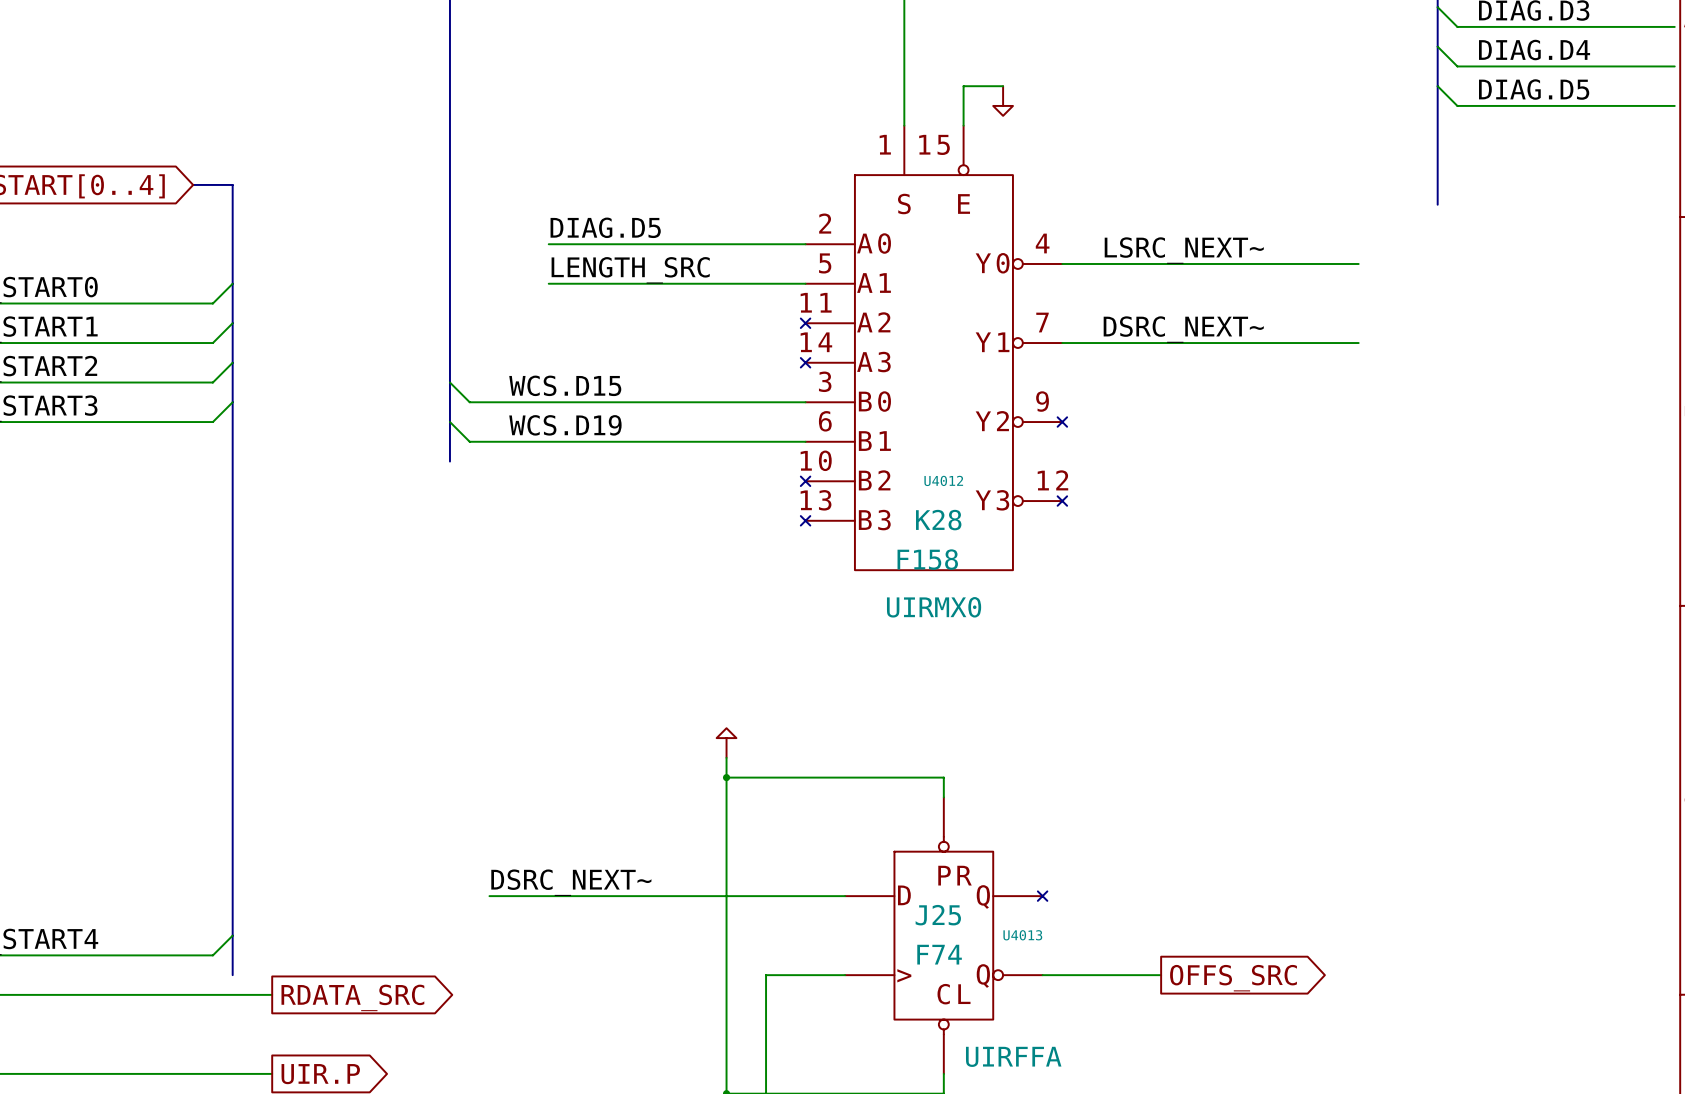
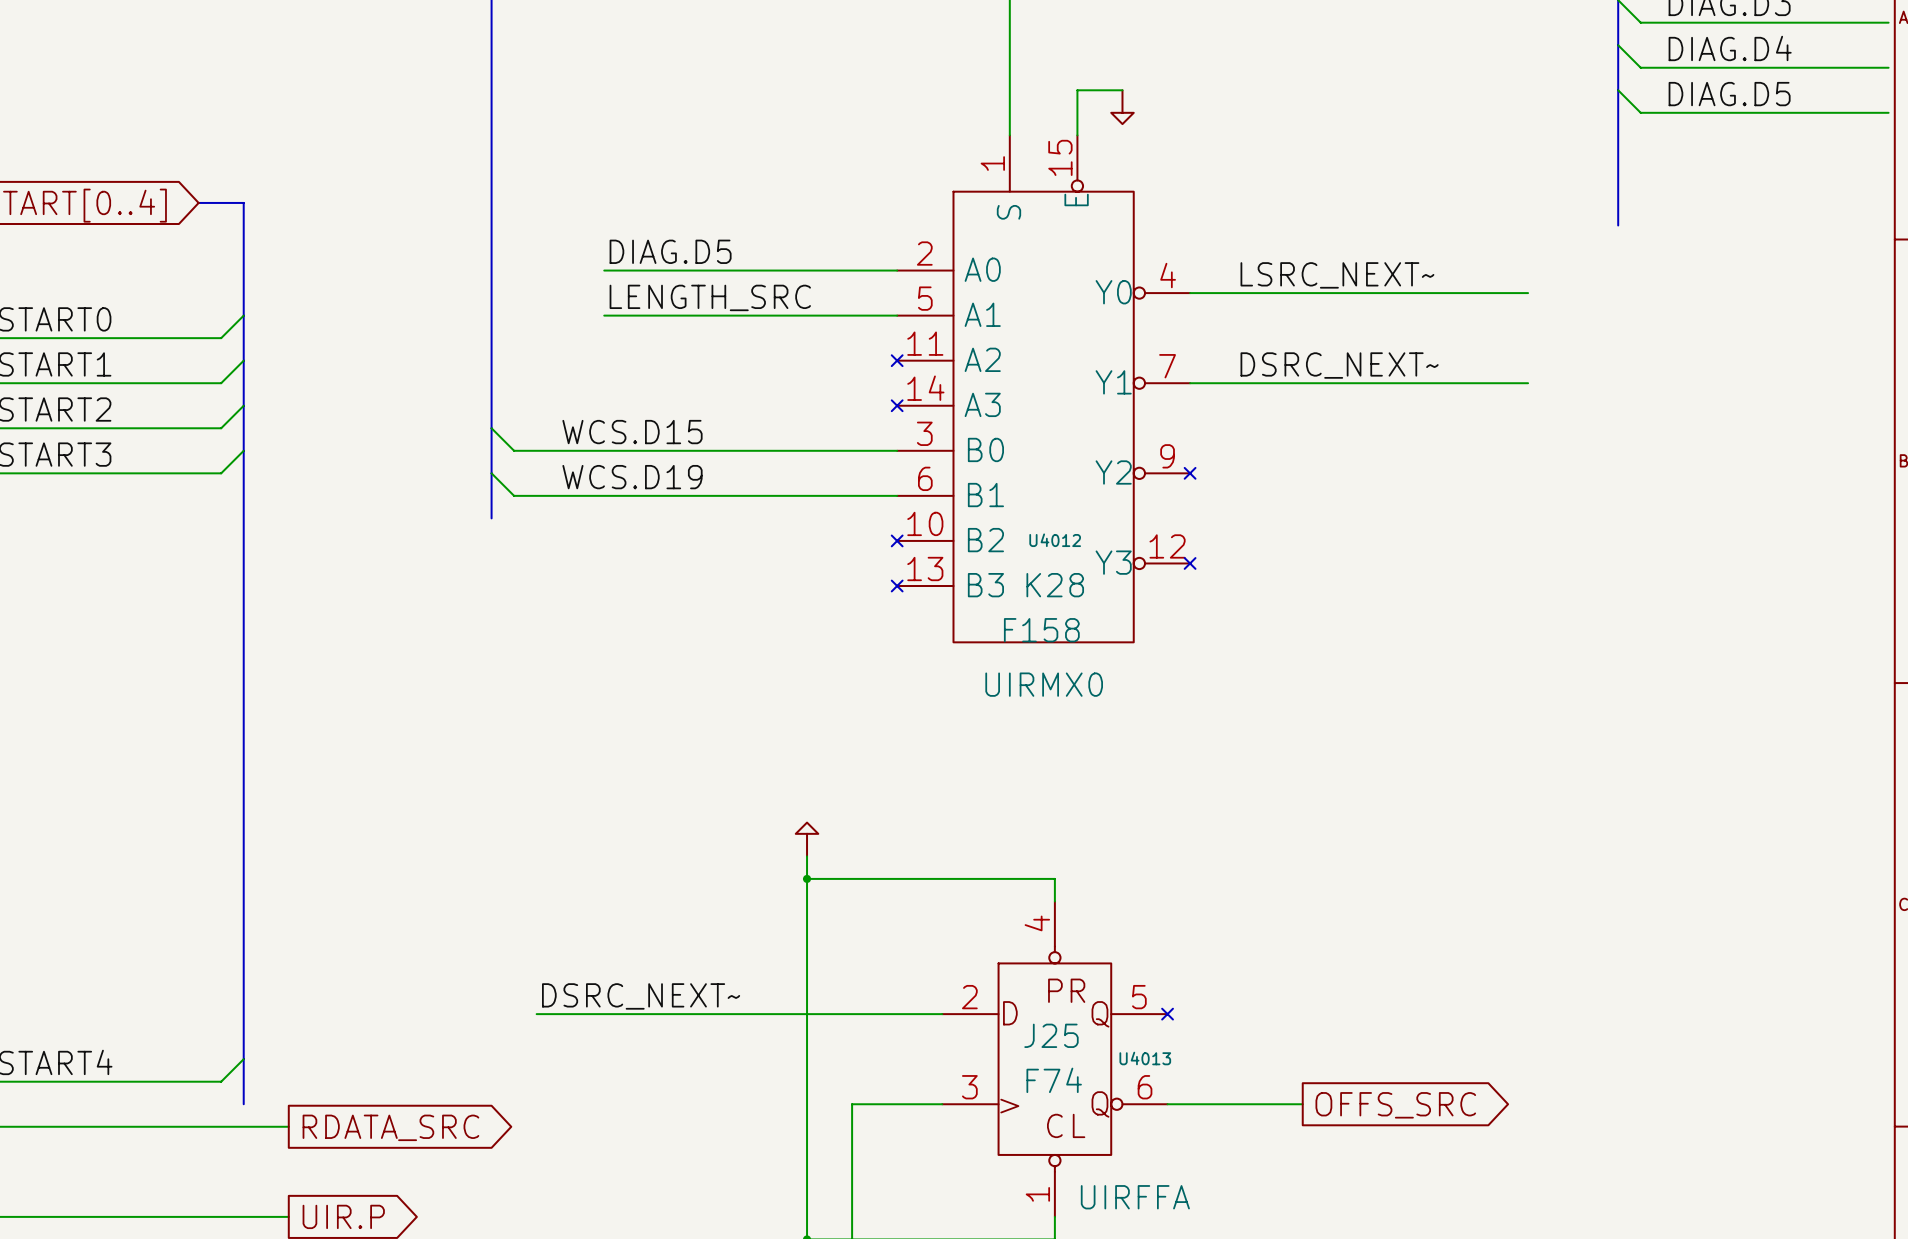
U4012 symbol: [805, 125, 1063, 571] -> [897, 135, 1191, 643]
U4013 pin number: none -> 4 (1037, 923)
U4013 pin number: none -> 2 (969, 997)
U4013 pin number: none -> 5 (1139, 997)
U4013 pin number: none -> 3 (969, 1087)
U4013 pin number: none -> 6 (1145, 1087)
U4013 pin number: none -> 1 (1037, 1194)

